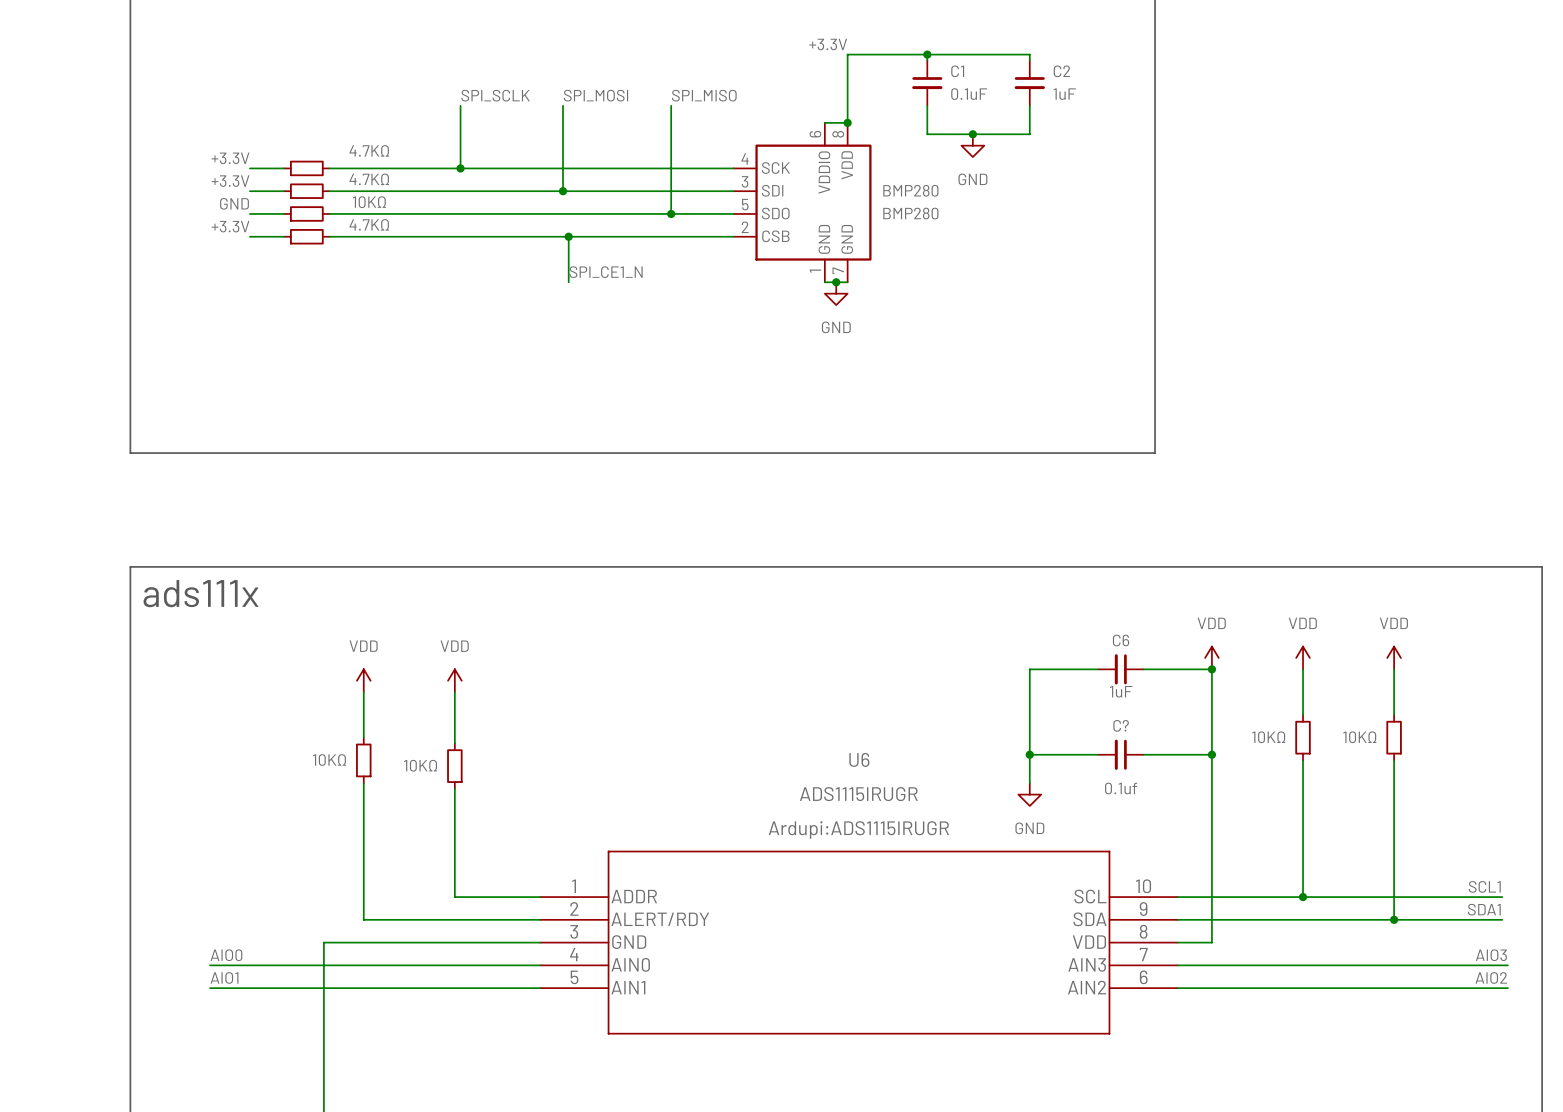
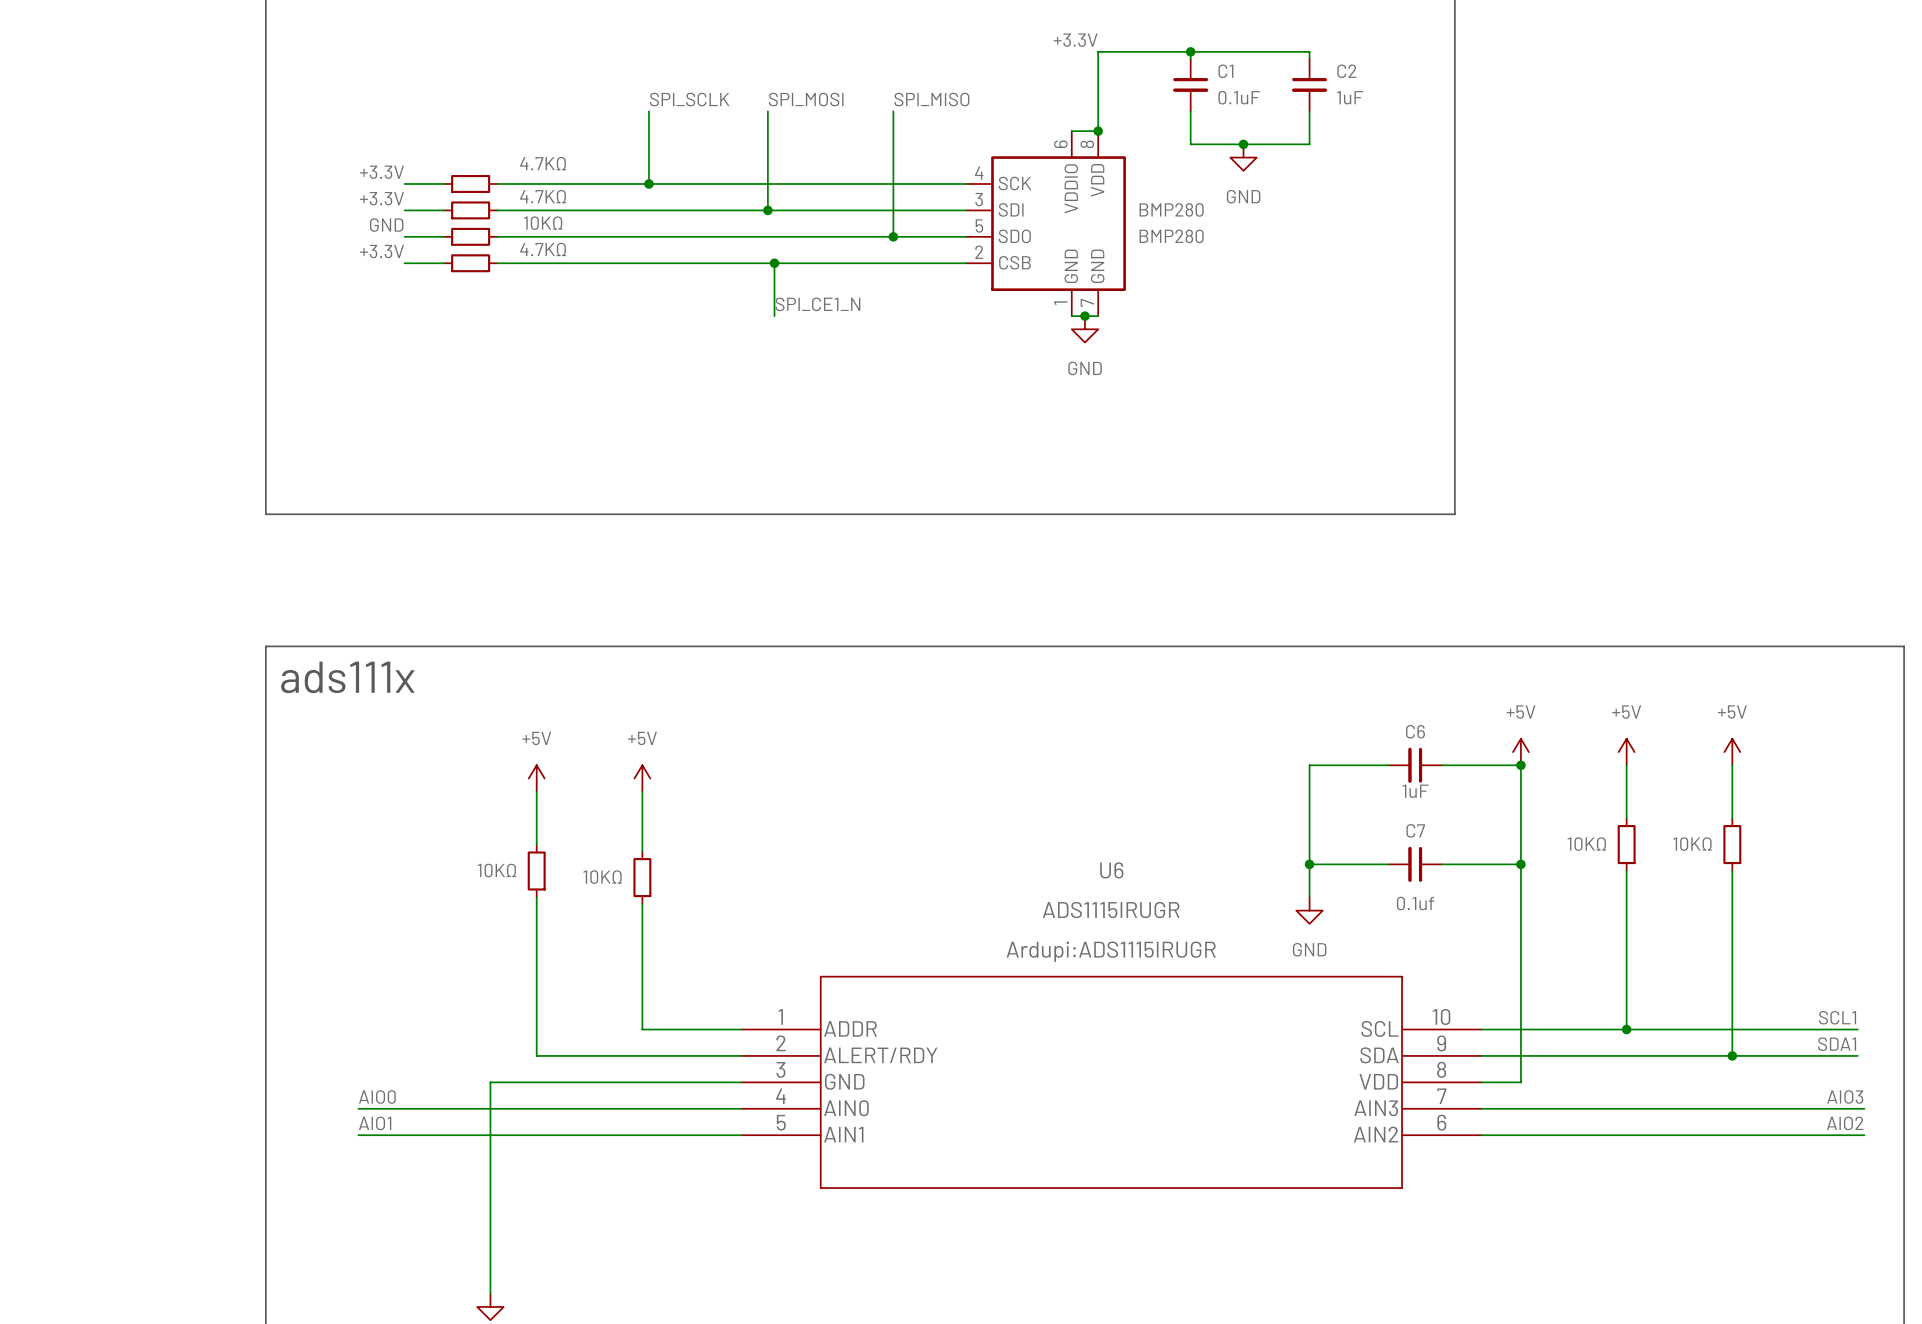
power symbol: VDD (1211, 657) -> +5V (1520, 752)
power symbol: VDD (1303, 657) -> +5V (1626, 752)
power symbol: VDD (1394, 657) -> +5V (1732, 752)
power symbol: VDD (363, 680) -> +5V (536, 778)
power symbol: VDD (454, 680) -> +5V (642, 778)
C? name: C? (1121, 725) -> C7 (1415, 830)

